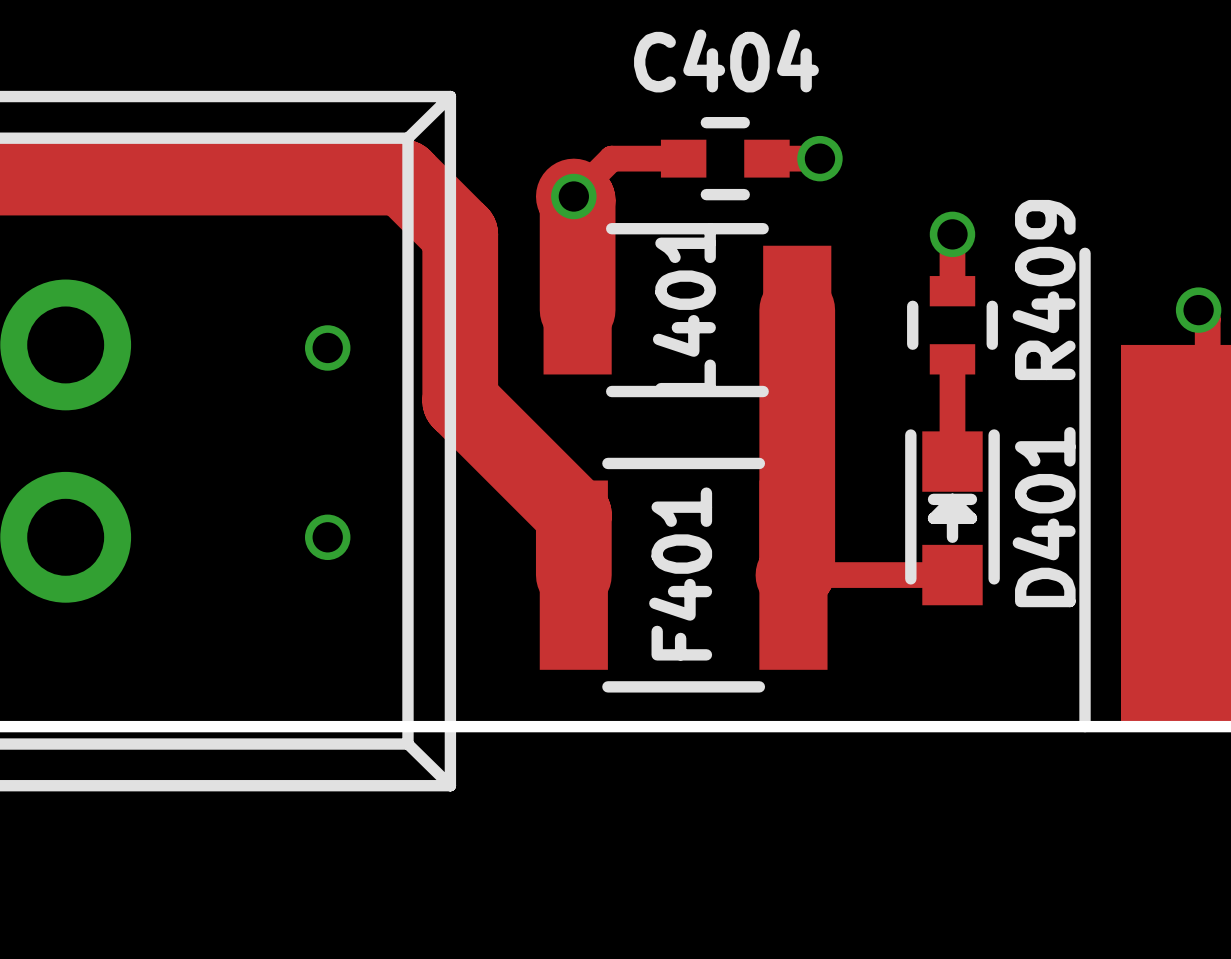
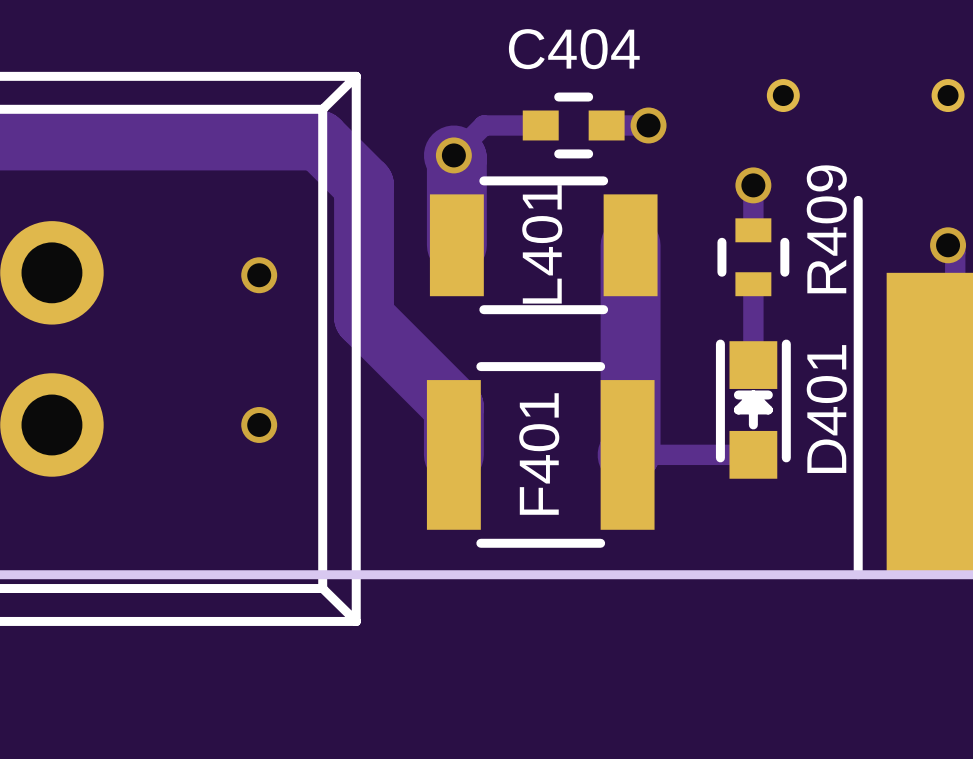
part: none -> (783, 95)
part: none -> (948, 95)

